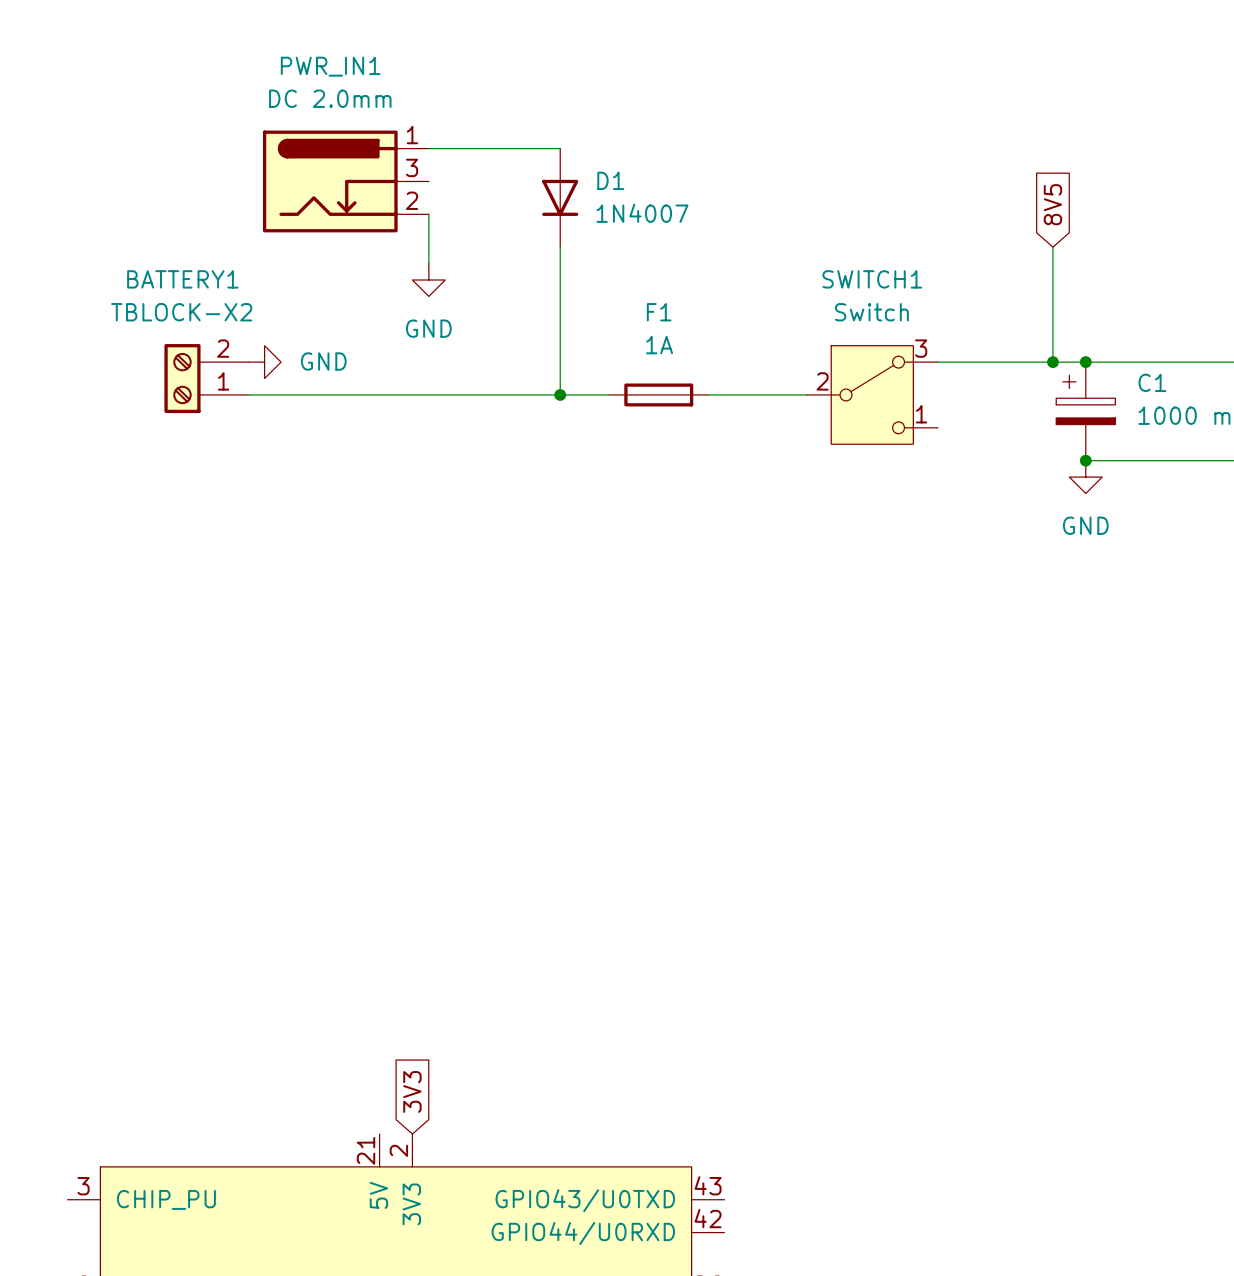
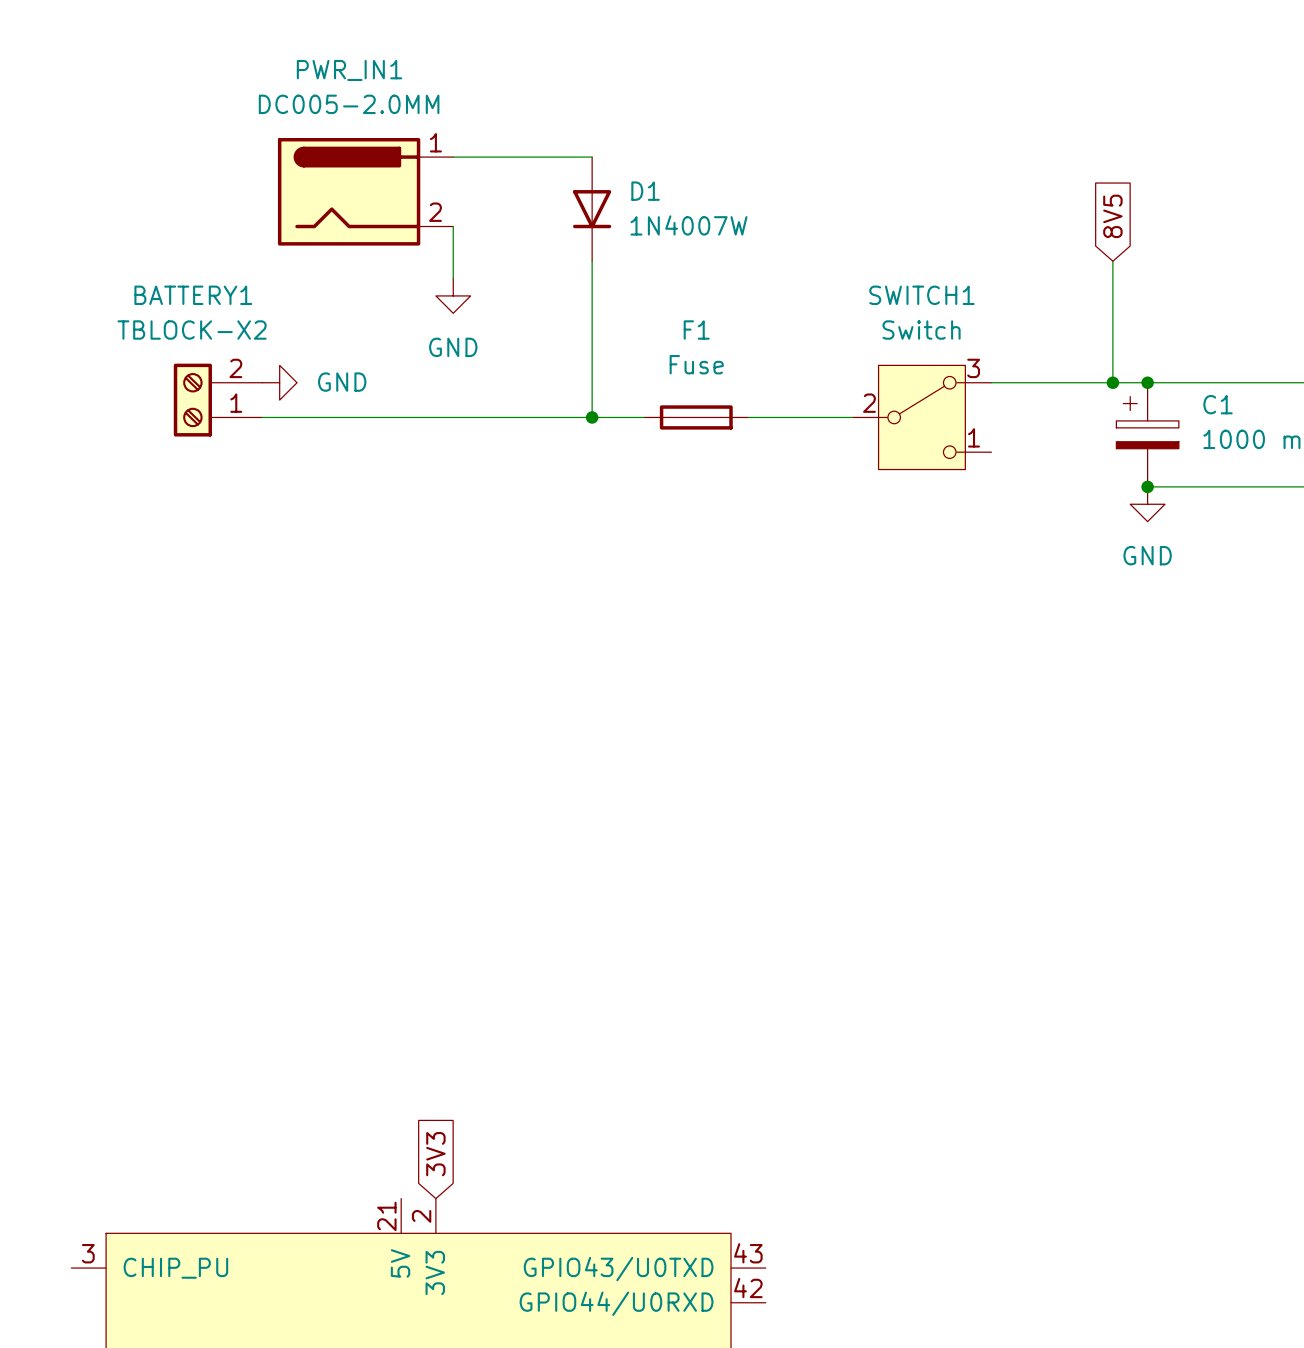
PWR_IN1 value: DC 2.0mm (330, 98) -> DC005-2.0MM (349, 104)
PWR_IN1 symbol: [262, 130, 429, 233] -> [277, 137, 454, 246]
D1 value: 1N4007 (642, 213) -> 1N4007W (688, 225)
F1 value: 1A (659, 345) -> Fuse (696, 364)

